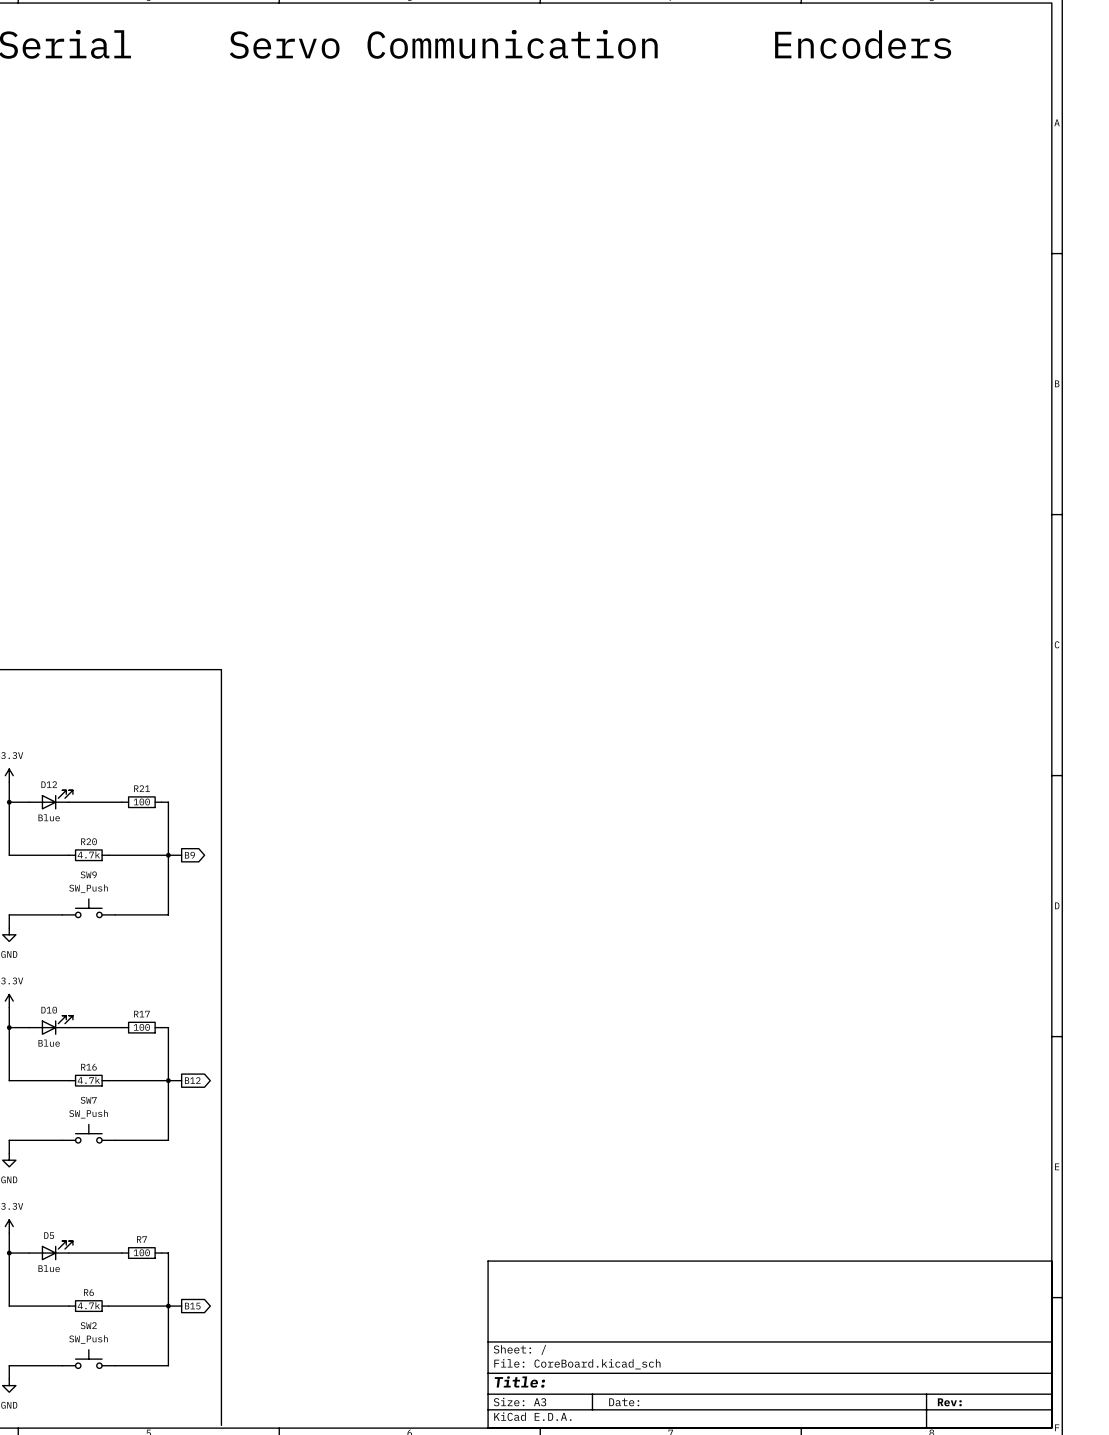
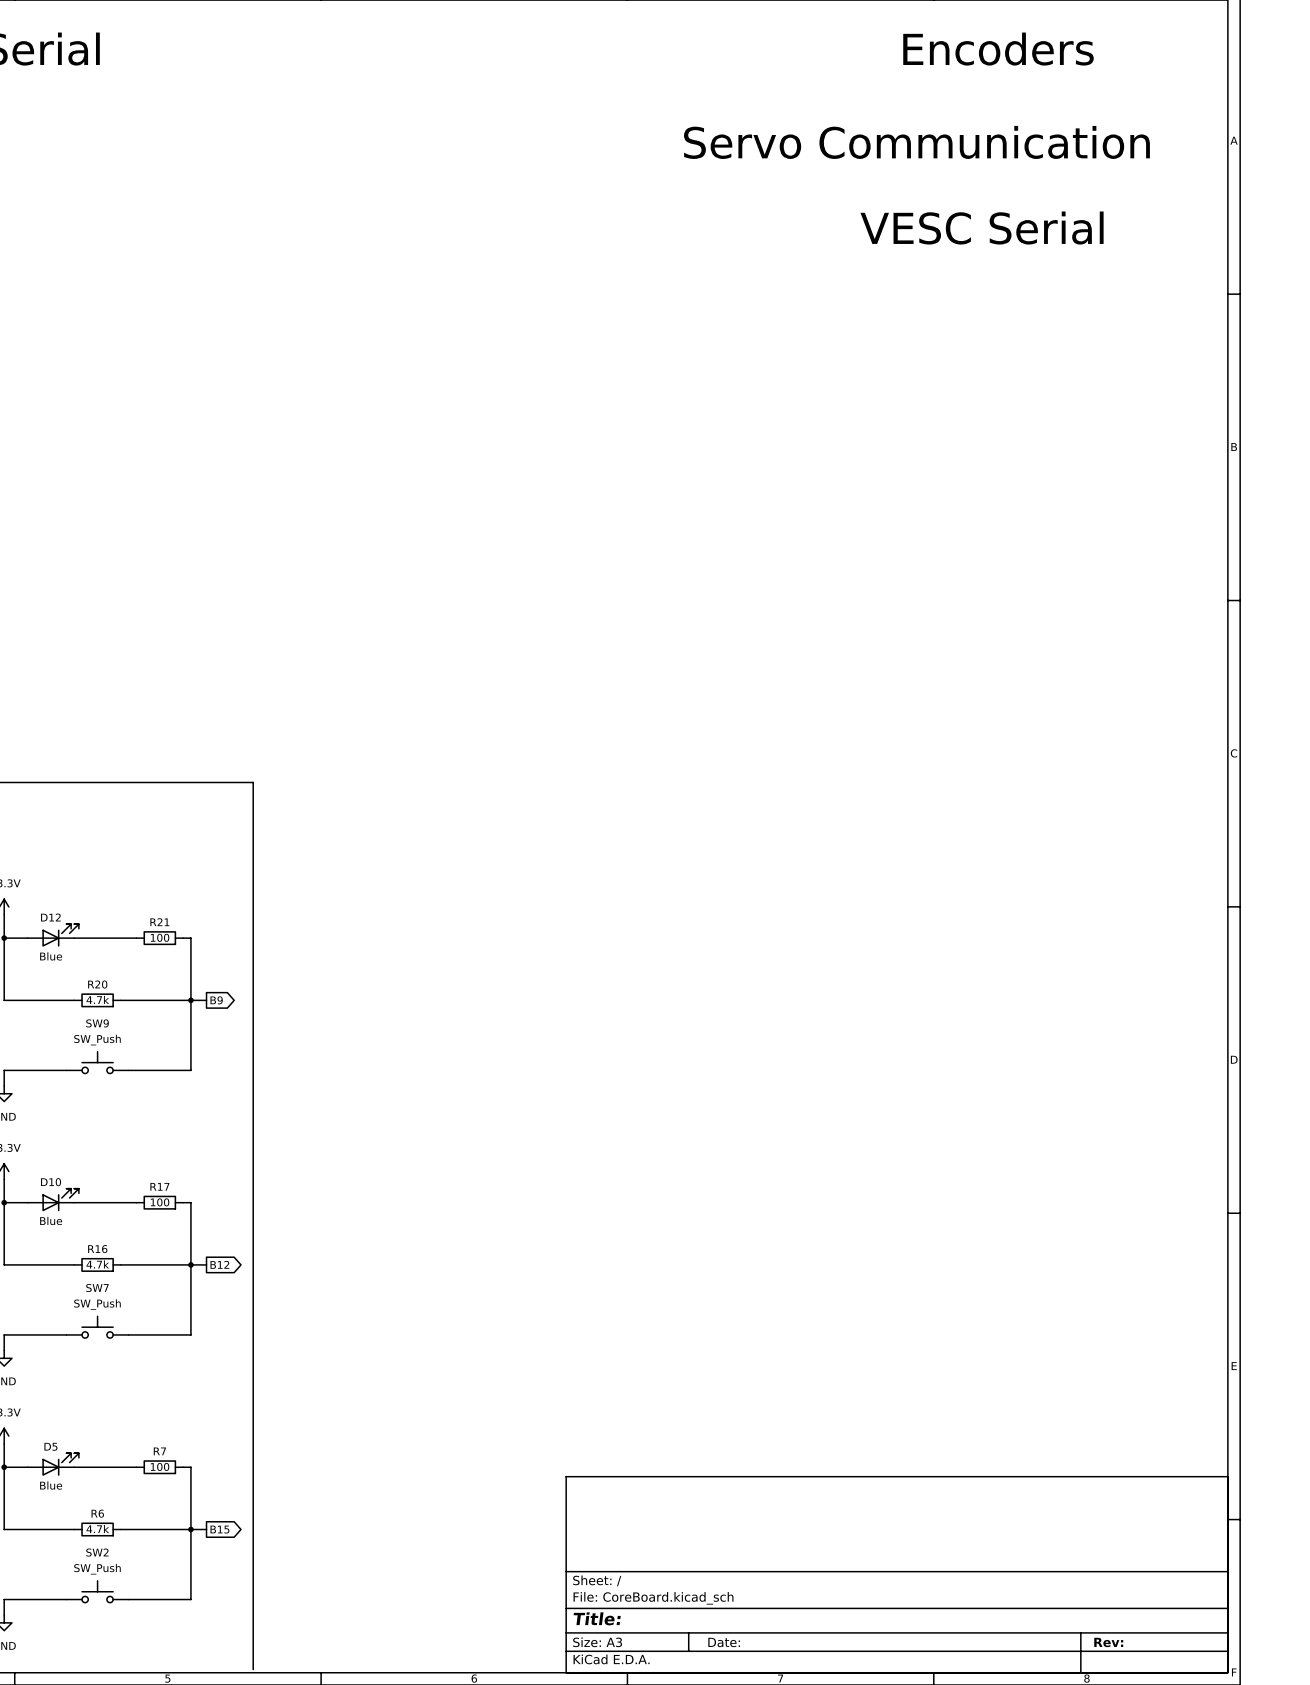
label: Servo Communication (443, 44) -> none
label: none -> Servo Communication (916, 142)
label: none -> VESC Serial (982, 228)

